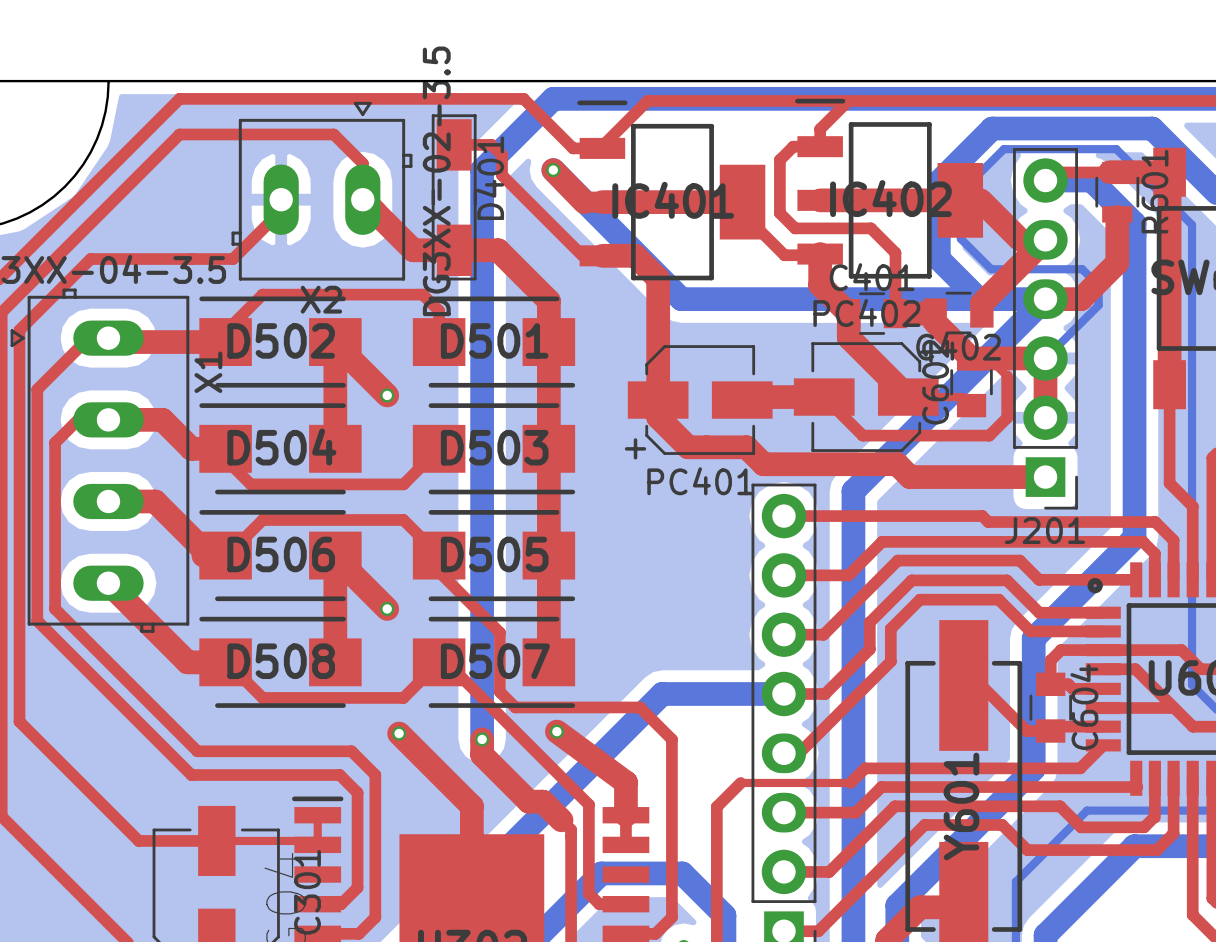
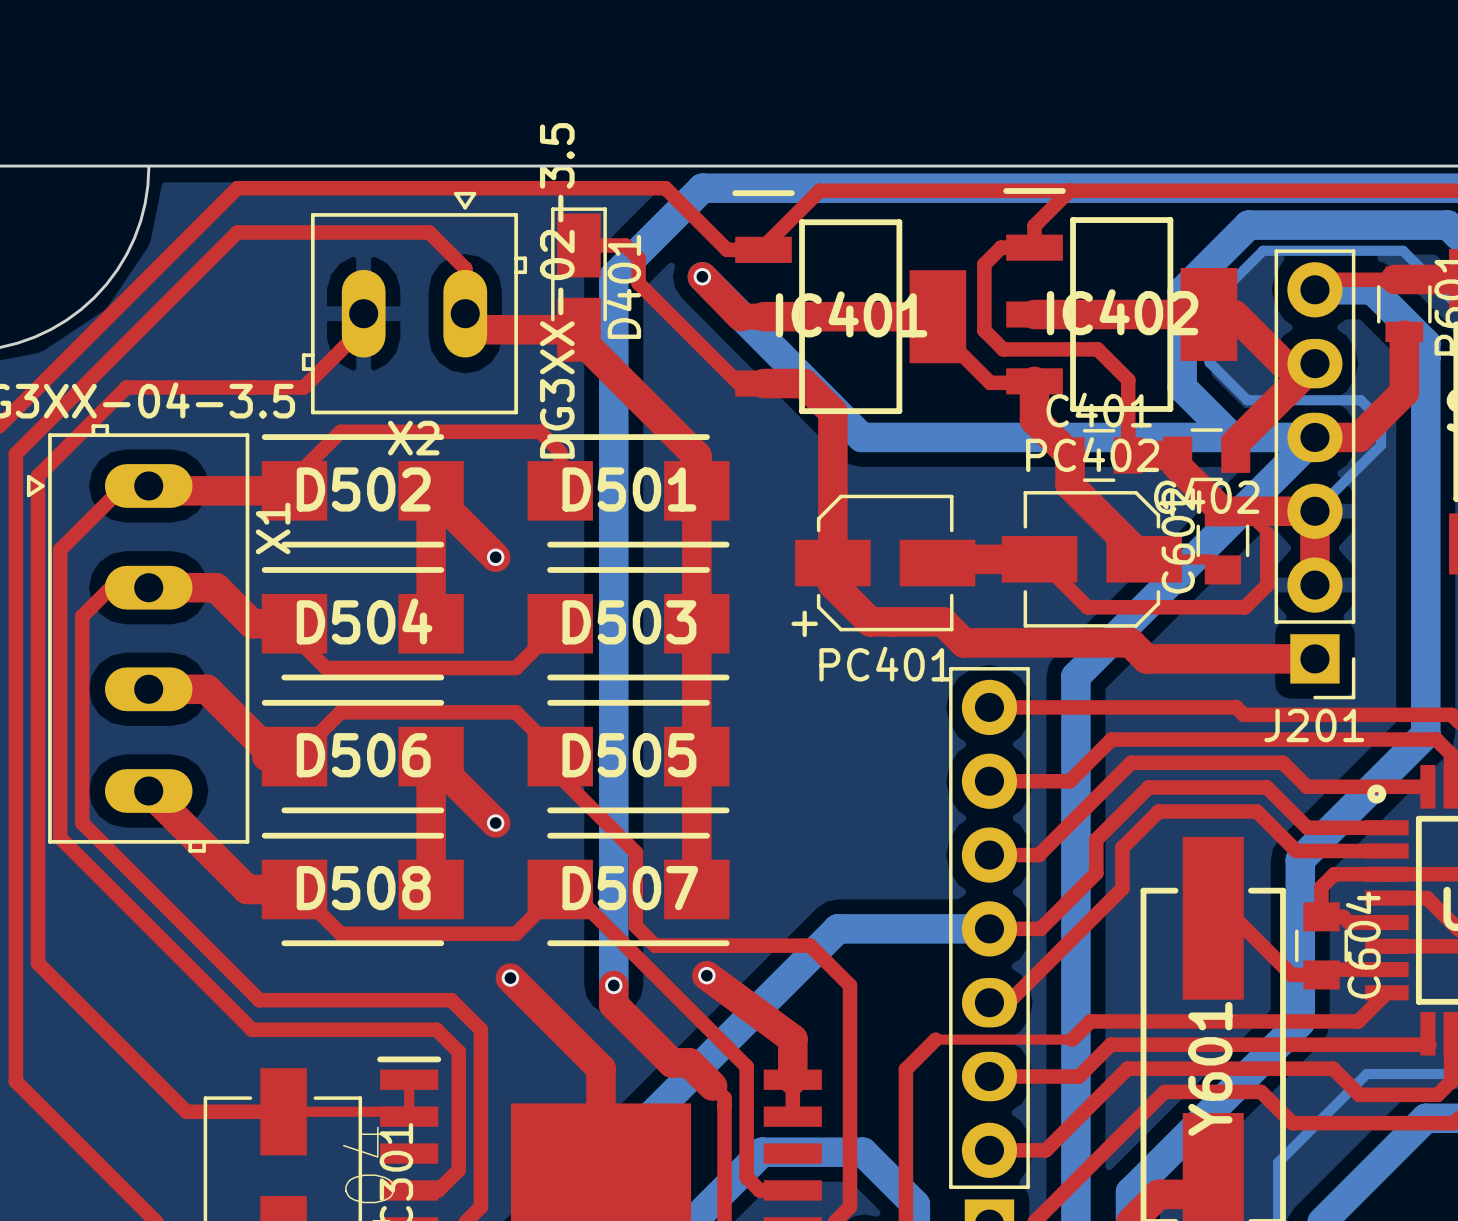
D401 footprint: [431, 114, 477, 281] -> [551, 207, 607, 362]
top track: (375, 212) (413, 250) (498, 250) (548, 300) (548, 313) -> (481, 329) (578, 329) (578, 337) (696, 455)

